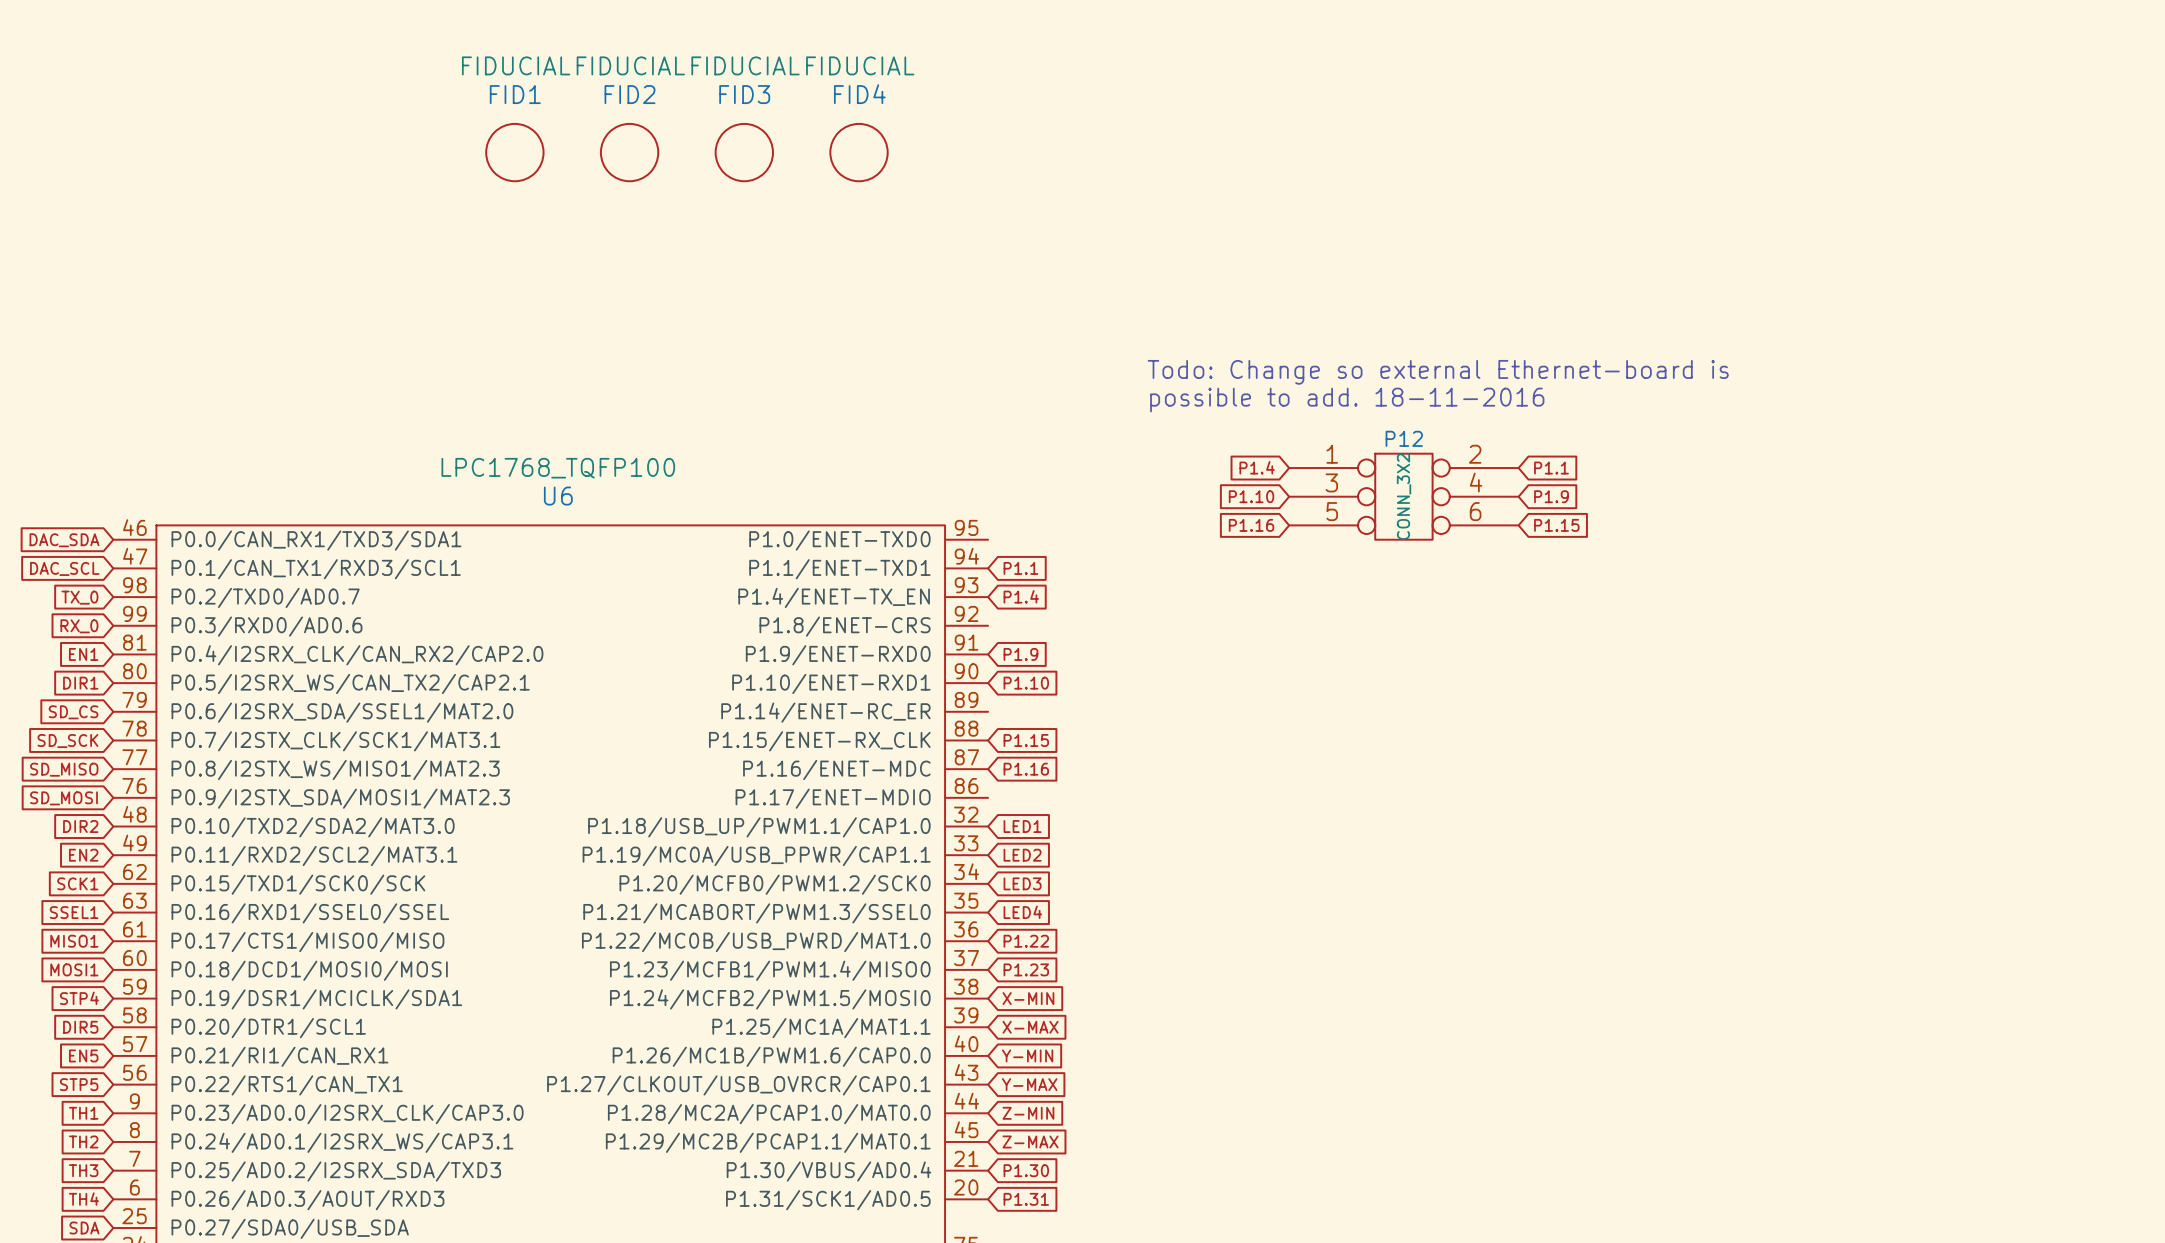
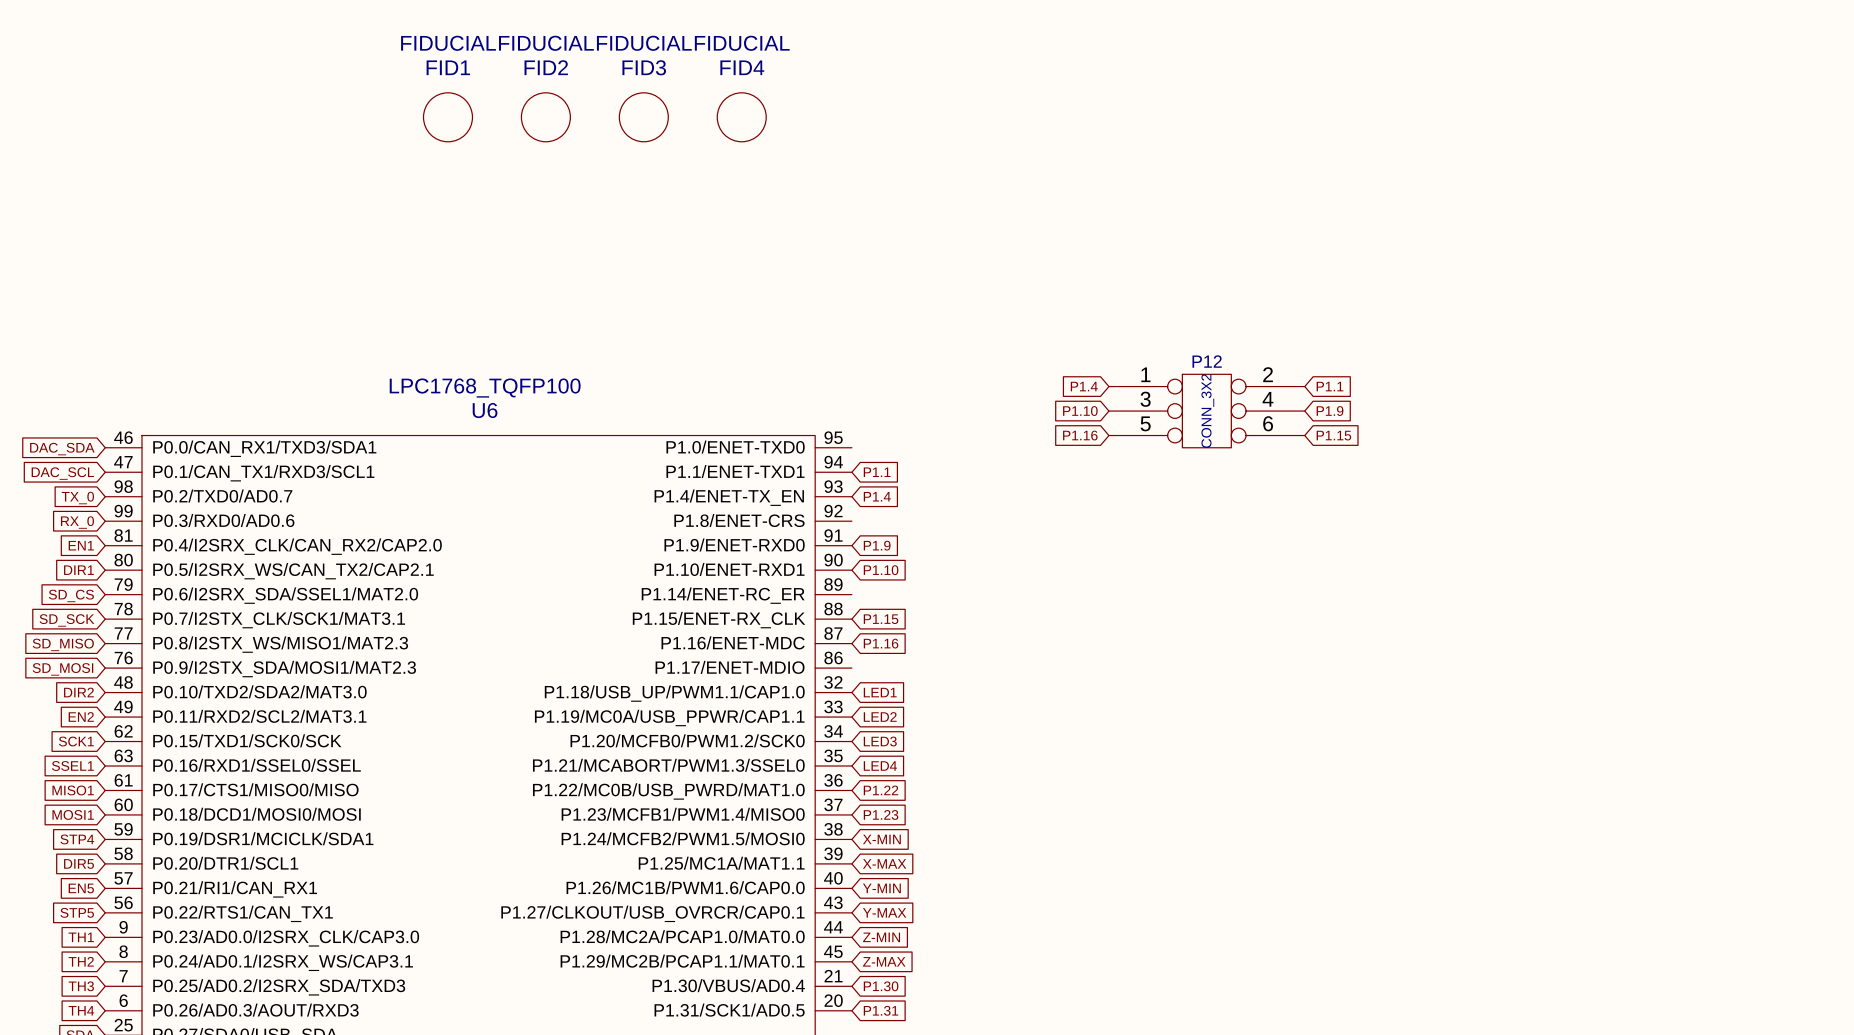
text: Todo: Change so external Ethernet-board is (1438, 372) -> none
text: possible to add. 18-11-2016 (1347, 400) -> none

